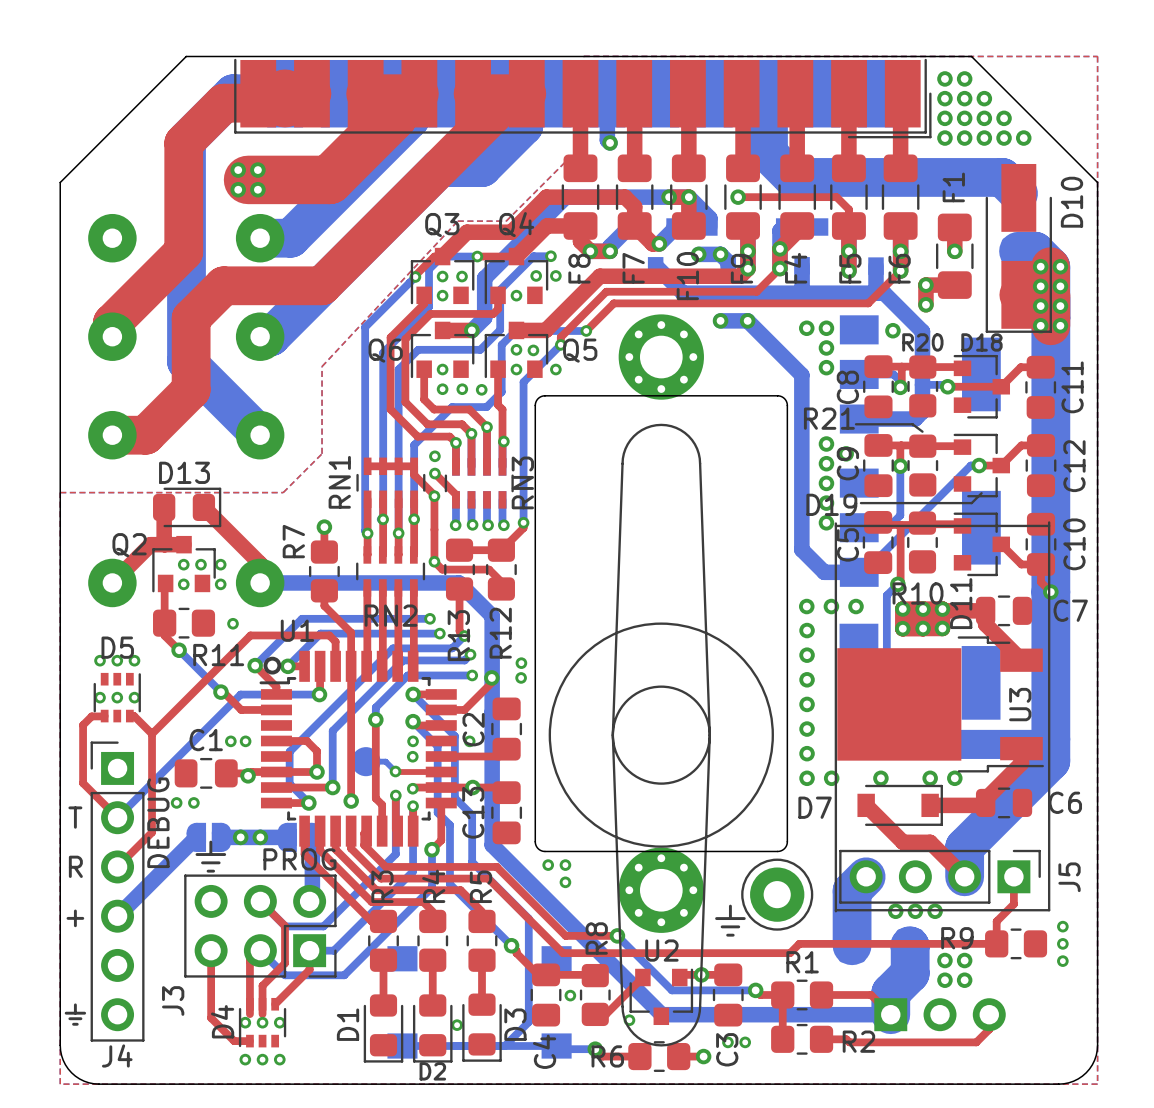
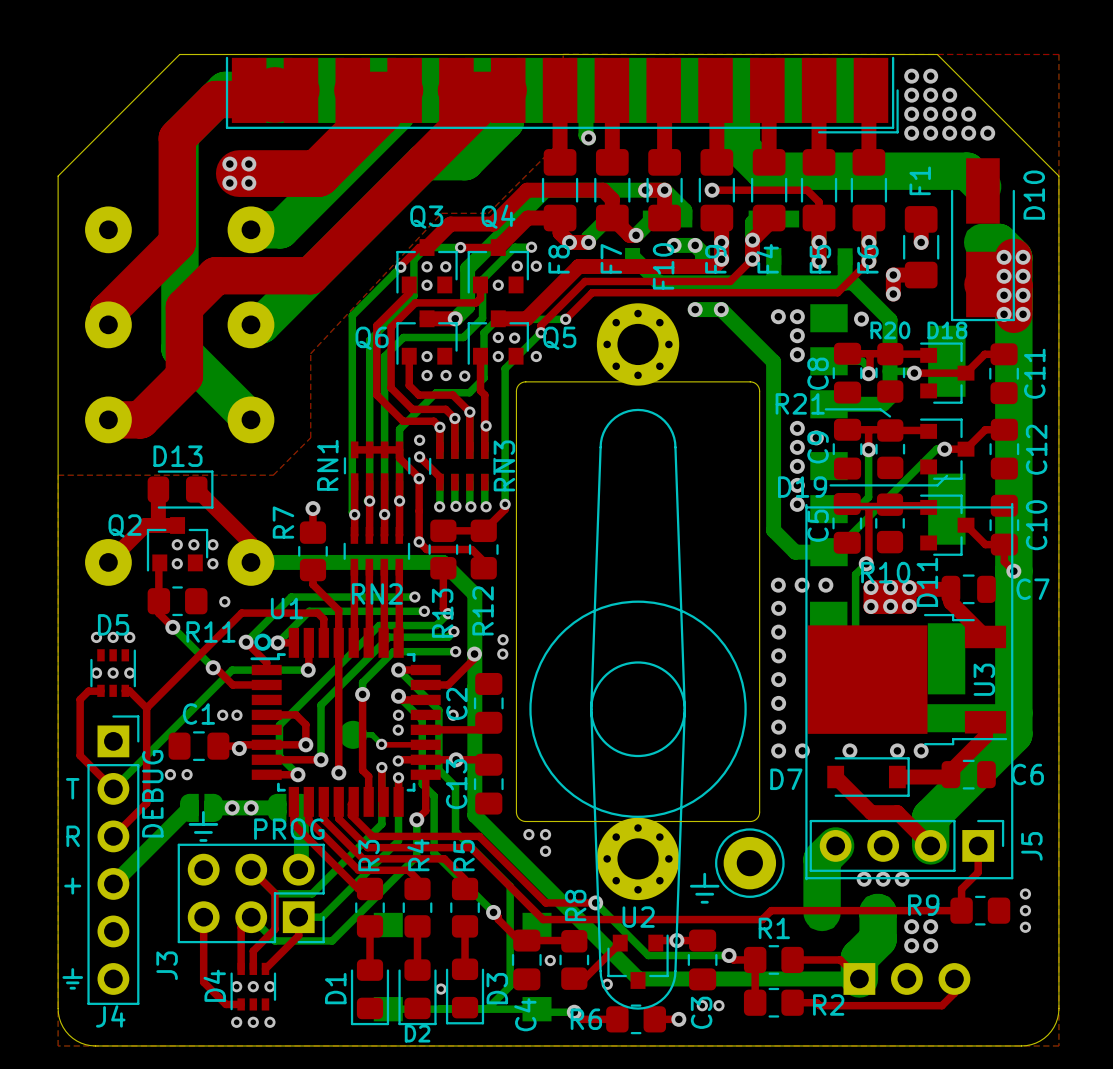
J4 footprint: [90, 741, 145, 1042] -> [87, 715, 140, 1005]
top track: (249, 1004) (249, 1014) -> none
top track: (262, 1004) (262, 1014) -> none

